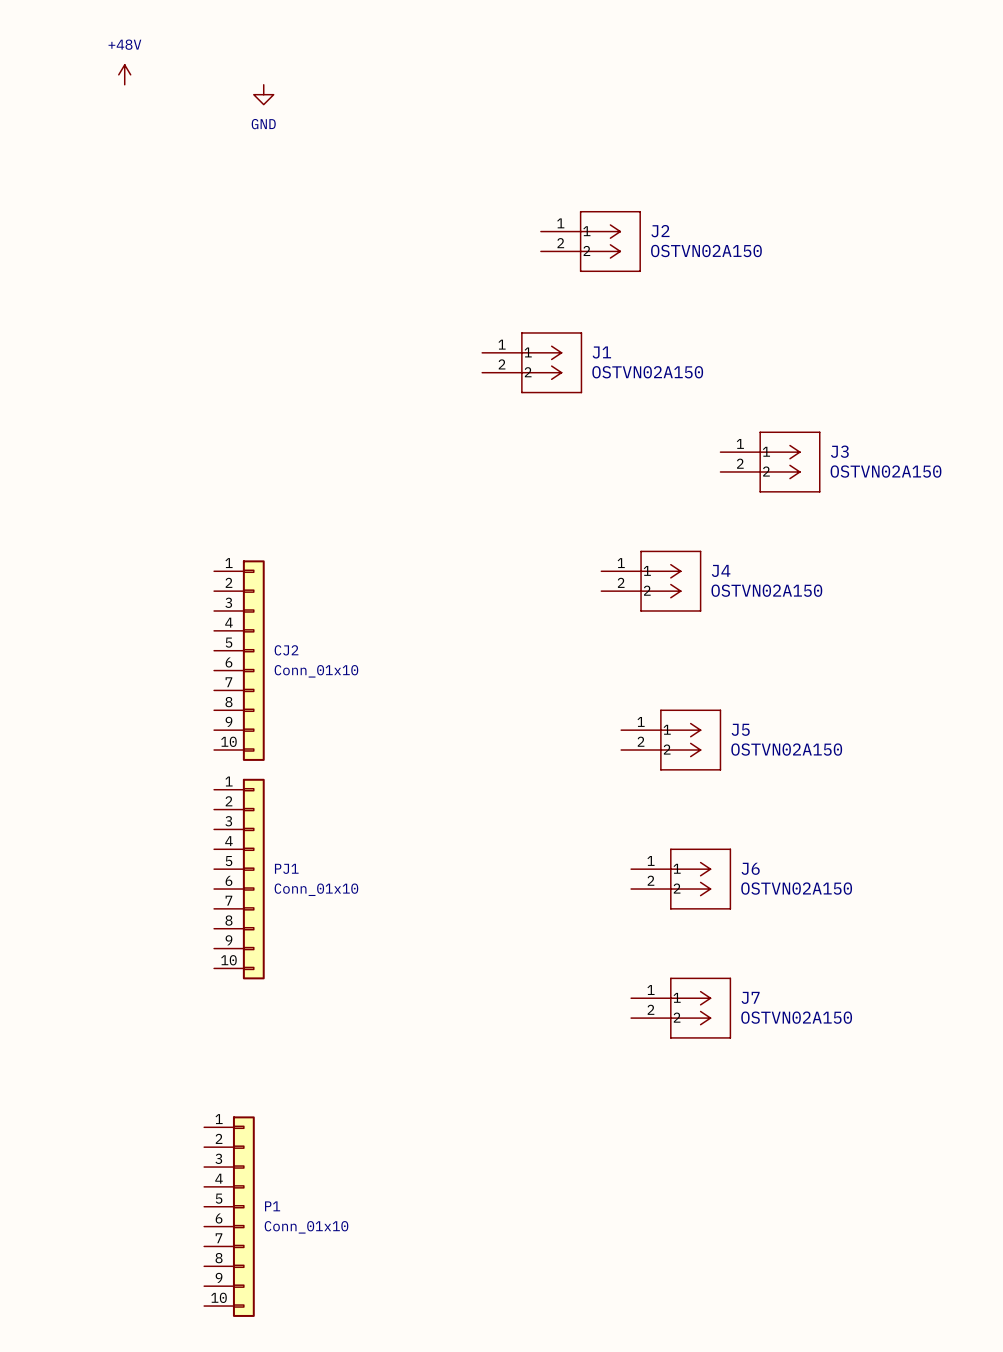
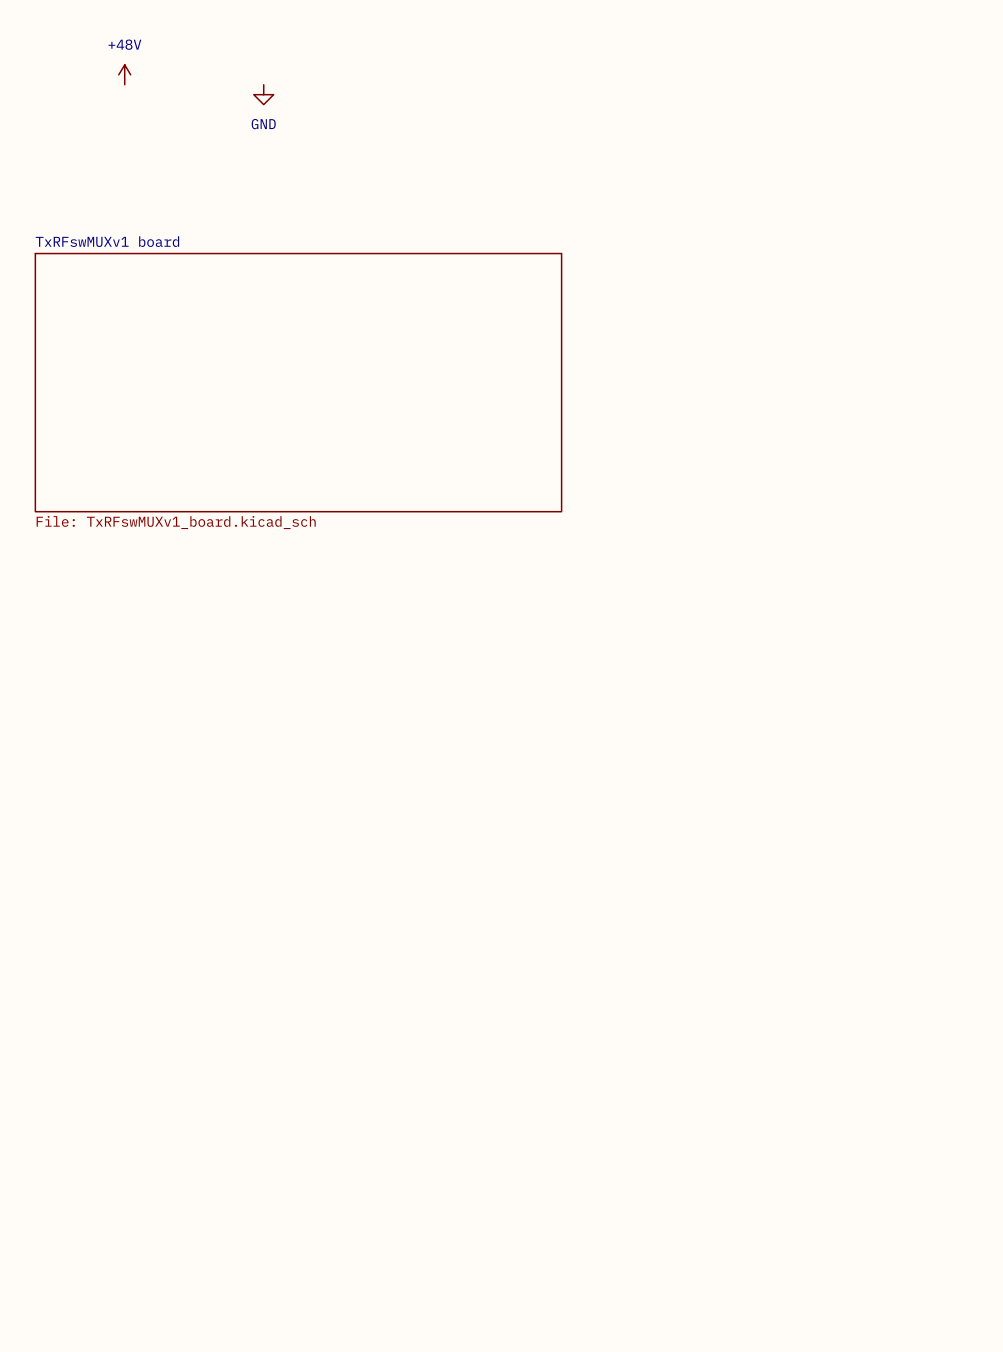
J2: OSTVN02A150 (590, 241) -> none
J1: OSTVN02A150 (532, 362) -> none
sheet TxRFswMUXv1 board: none -> File: TxRFswMUXv1_board.kicad_sch (298, 382)
J3: OSTVN02A150 (770, 462) -> none
J4: OSTVN02A150 (651, 581) -> none
CJ2: Conn_01x10 (239, 660) -> none
J5: OSTVN02A150 (671, 740) -> none
PJ1: Conn_01x10 (239, 879) -> none
J6: OSTVN02A150 (680, 879) -> none
J7: OSTVN02A150 (680, 1008) -> none
P1: Conn_01x10 (229, 1216) -> none

